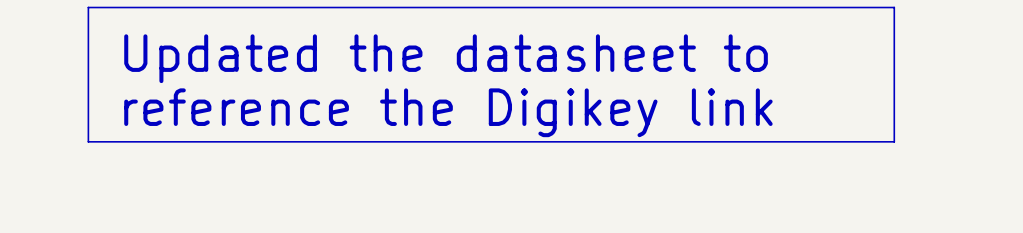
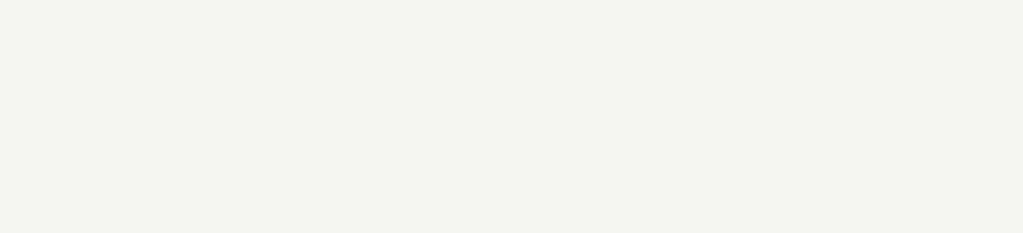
line: (88, 7) (894, 7) (894, 141) (88, 141) (88, 7) -> none
text: Updated the datasheet to (446, 58) -> none
text: reference the Digikey link (448, 112) -> none

